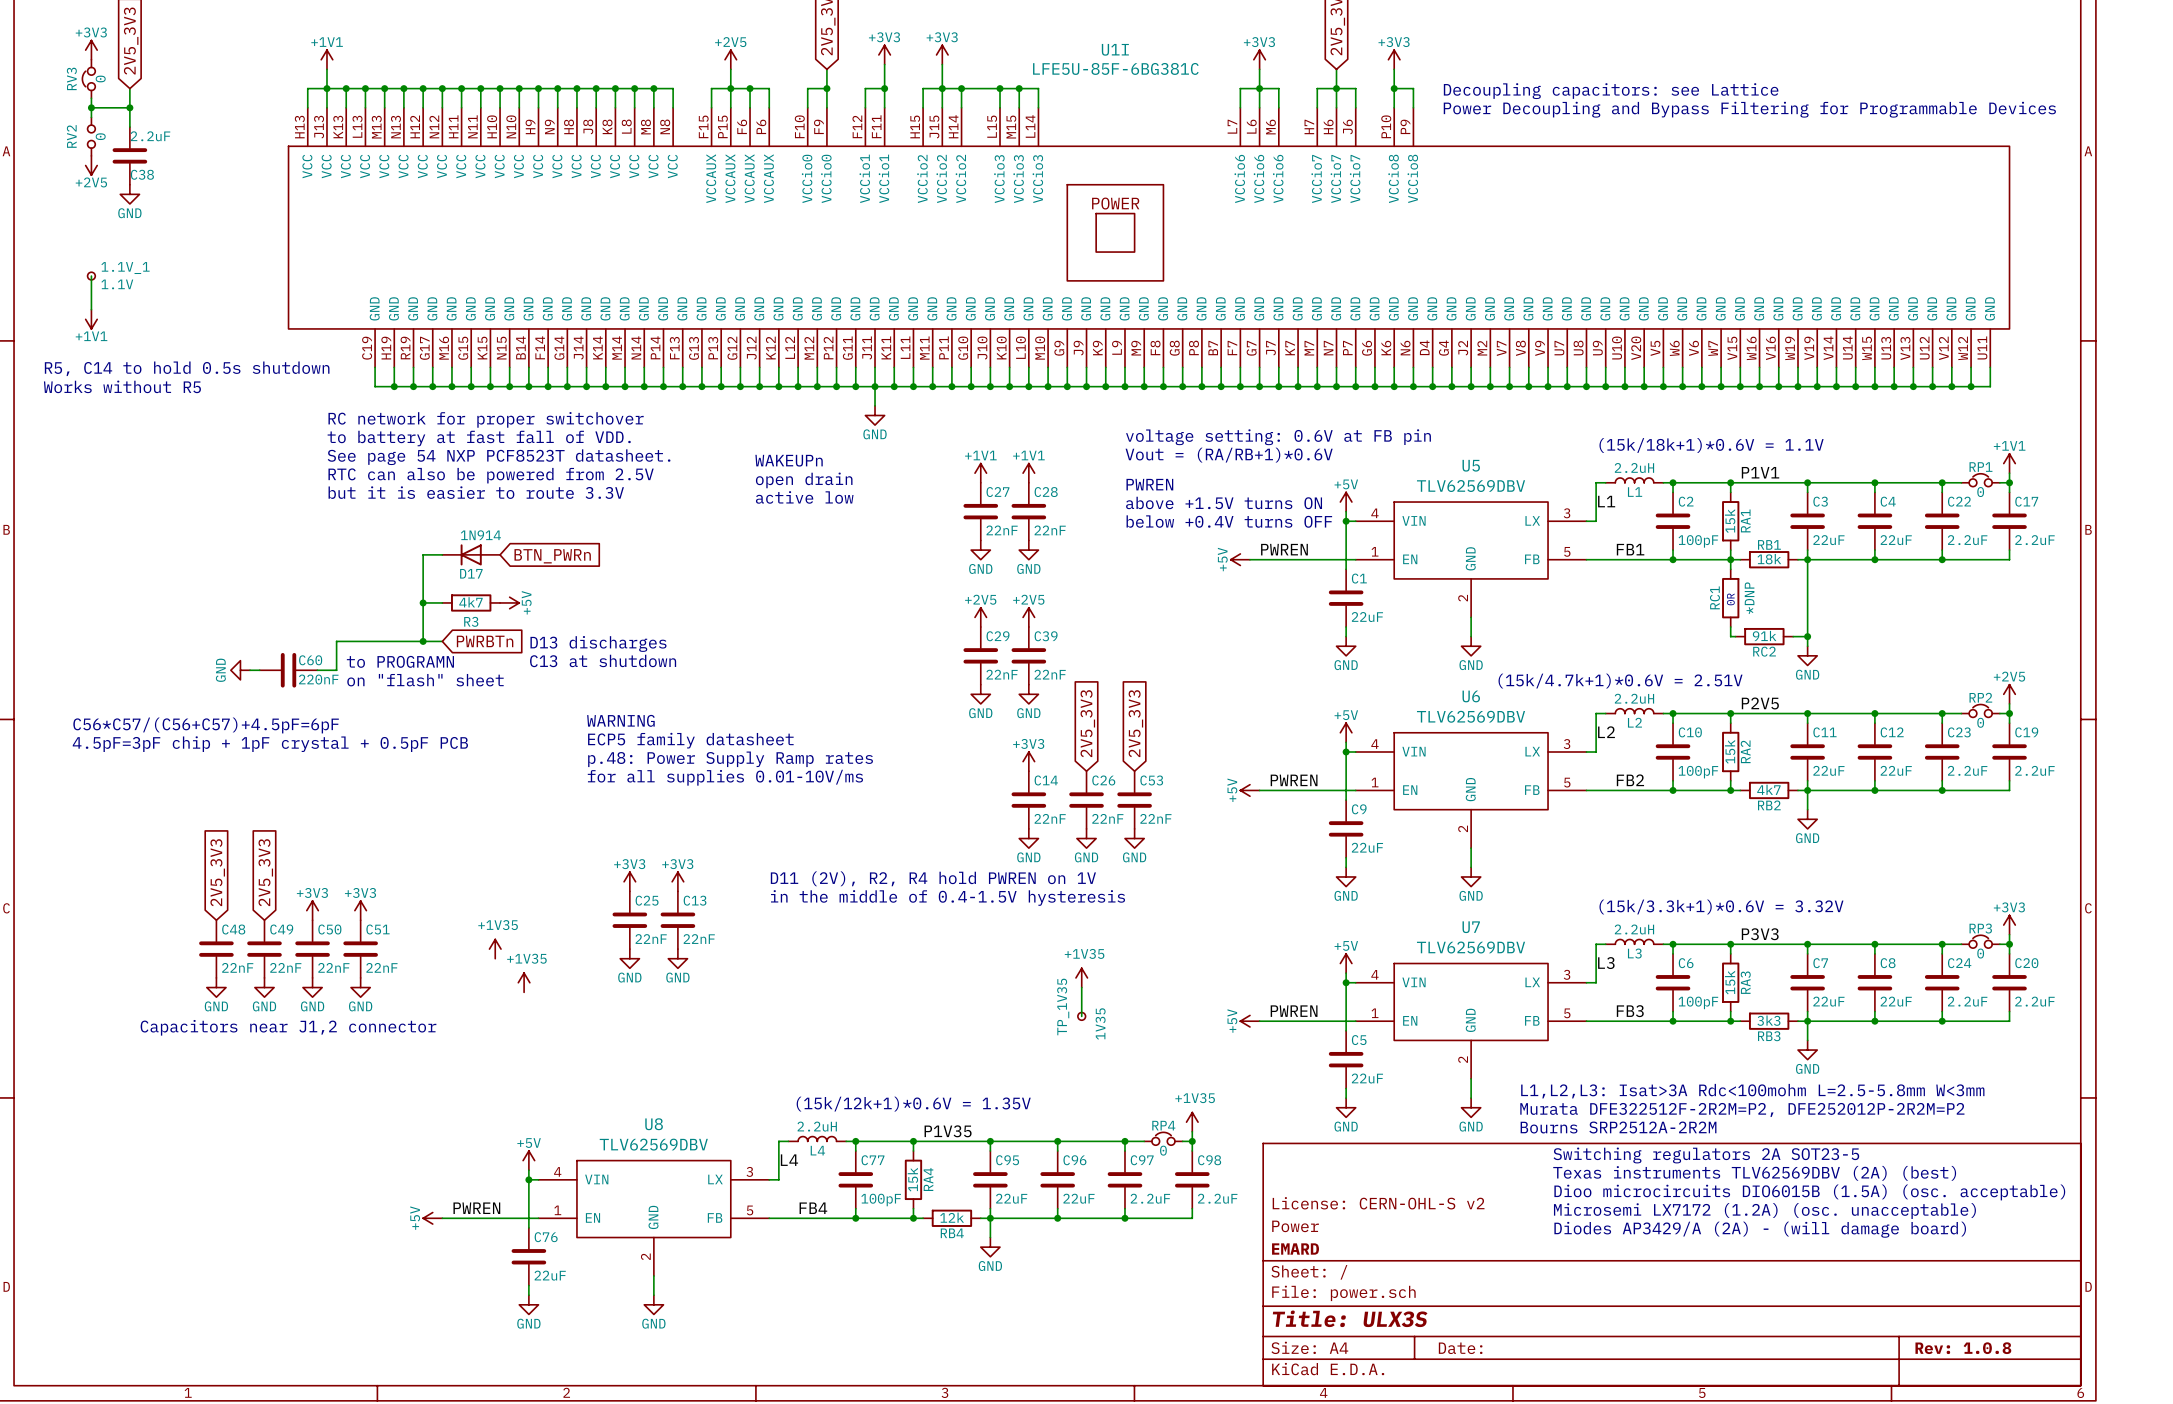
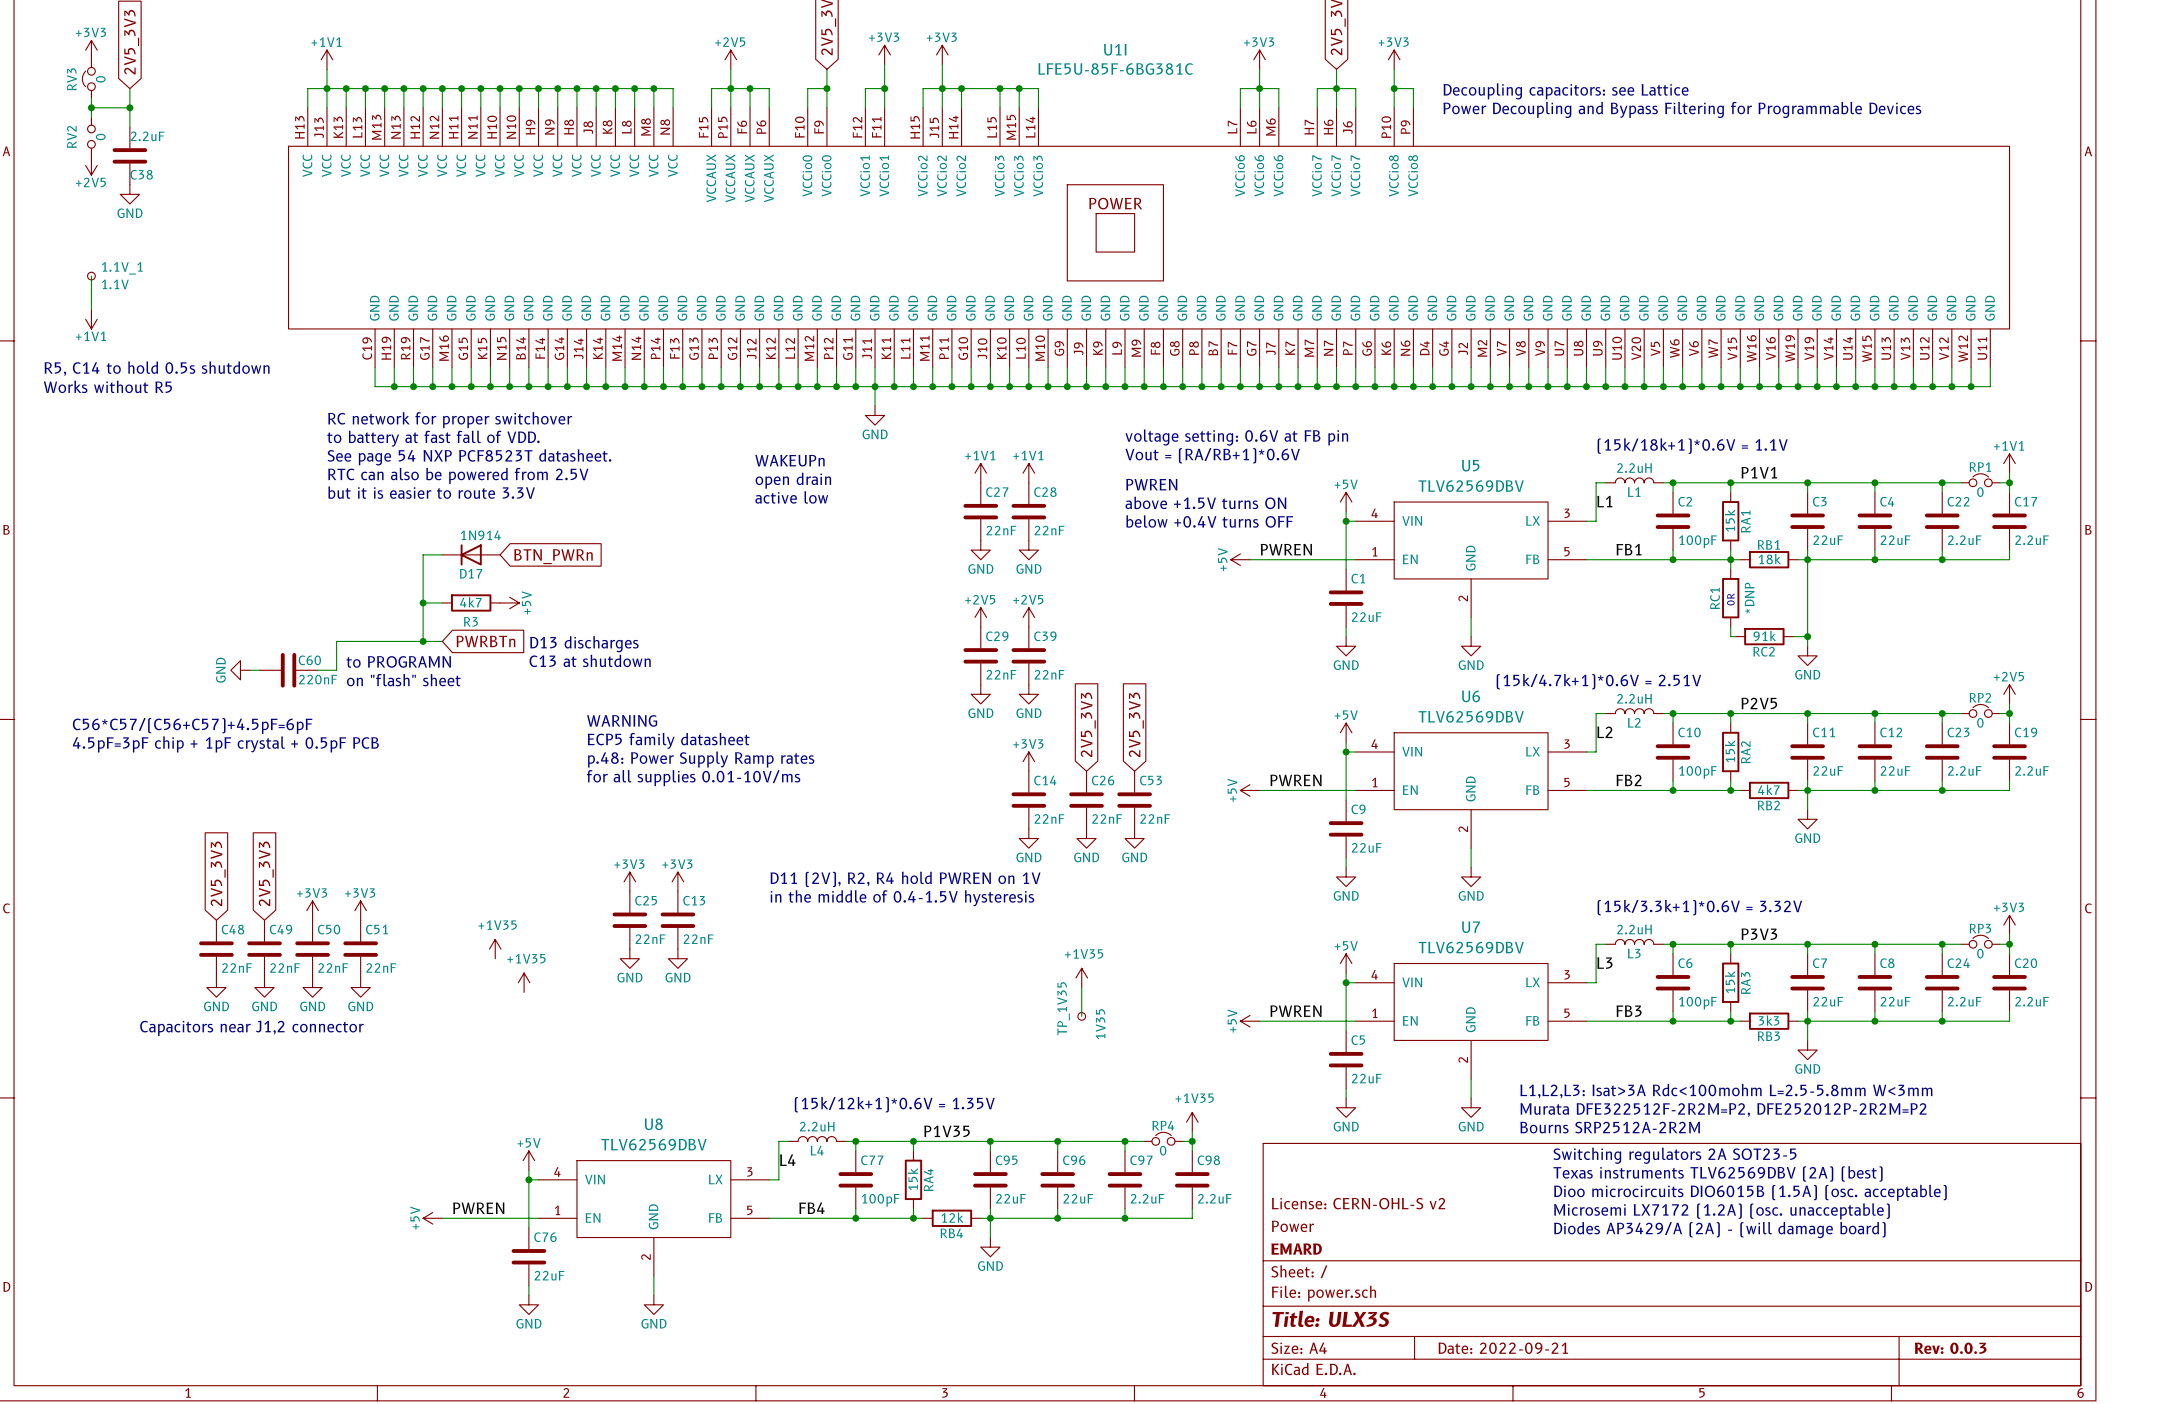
title block: Date: (1460, 1348) -> Date: 2022-09-21 (1503, 1348)
title block: Rev: 1.0.8 (1963, 1348) -> Rev: 0.0.3 (1950, 1348)

